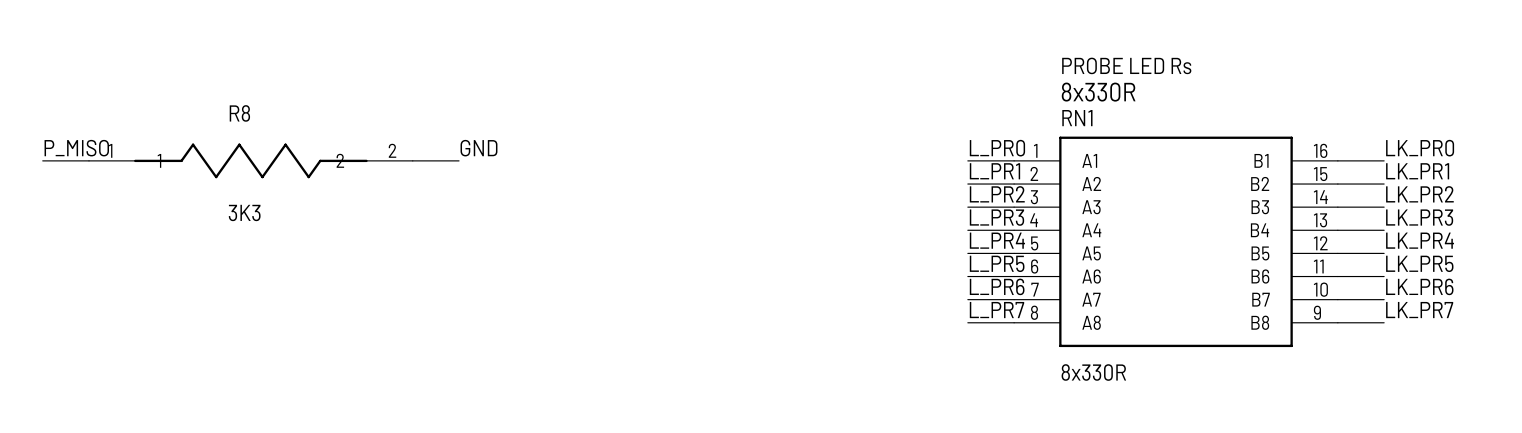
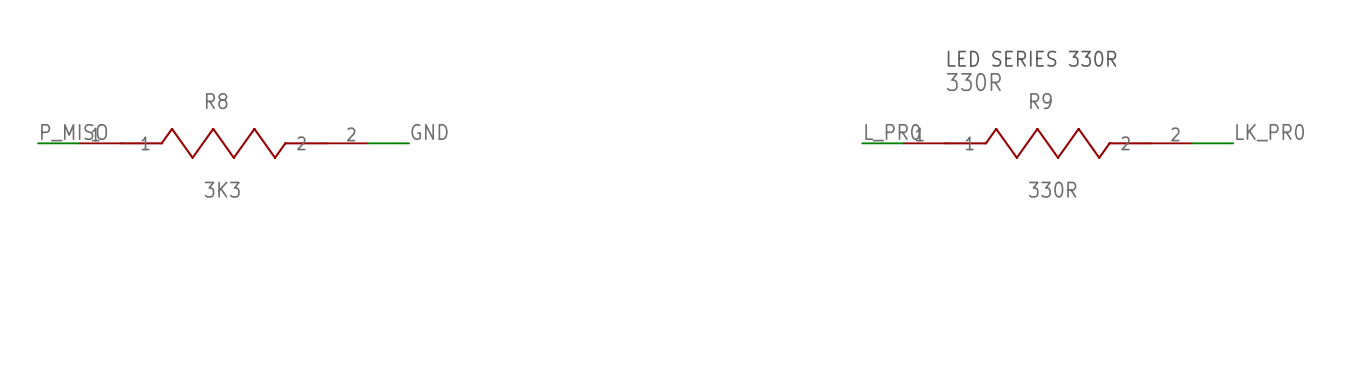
text: PROBE LED Rs (1126, 65) -> LED SERIES 330R (1032, 58)
text: 8x330R (1098, 92) -> 330R (973, 82)
R9: none -> 330R (1047, 143)
label: L_PR1 (994, 171) -> none
label: LK_PR1 (1417, 171) -> none
wire: (967, 184) (1014, 184) -> none
wire: (1337, 184) (1384, 184) -> none
label: L_PR2 (997, 194) -> none
label: LK_PR2 (1419, 194) -> none
wire: (967, 207) (1014, 207) -> none
wire: (1337, 207) (1384, 207) -> none
label: L_PR3 (996, 217) -> none
label: LK_PR3 (1419, 217) -> none
wire: (967, 230) (1014, 230) -> none
wire: (1337, 230) (1384, 230) -> none
label: L_PR4 (997, 240) -> none
label: LK_PR4 (1420, 240) -> none
RN1: 8x330R (1175, 241) -> none
wire: (967, 253) (1014, 253) -> none
wire: (1337, 253) (1384, 253) -> none
label: L_PR5 (997, 263) -> none
label: LK_PR5 (1419, 263) -> none
wire: (967, 276) (1014, 276) -> none
wire: (1337, 276) (1384, 276) -> none
label: L_PR6 (997, 286) -> none
label: LK_PR6 (1419, 286) -> none
wire: (967, 299) (1014, 299) -> none
wire: (1337, 299) (1384, 299) -> none
label: L_PR7 (996, 310) -> none
label: LK_PR7 (1419, 310) -> none
wire: (967, 322) (1014, 322) -> none
wire: (1337, 322) (1384, 322) -> none

